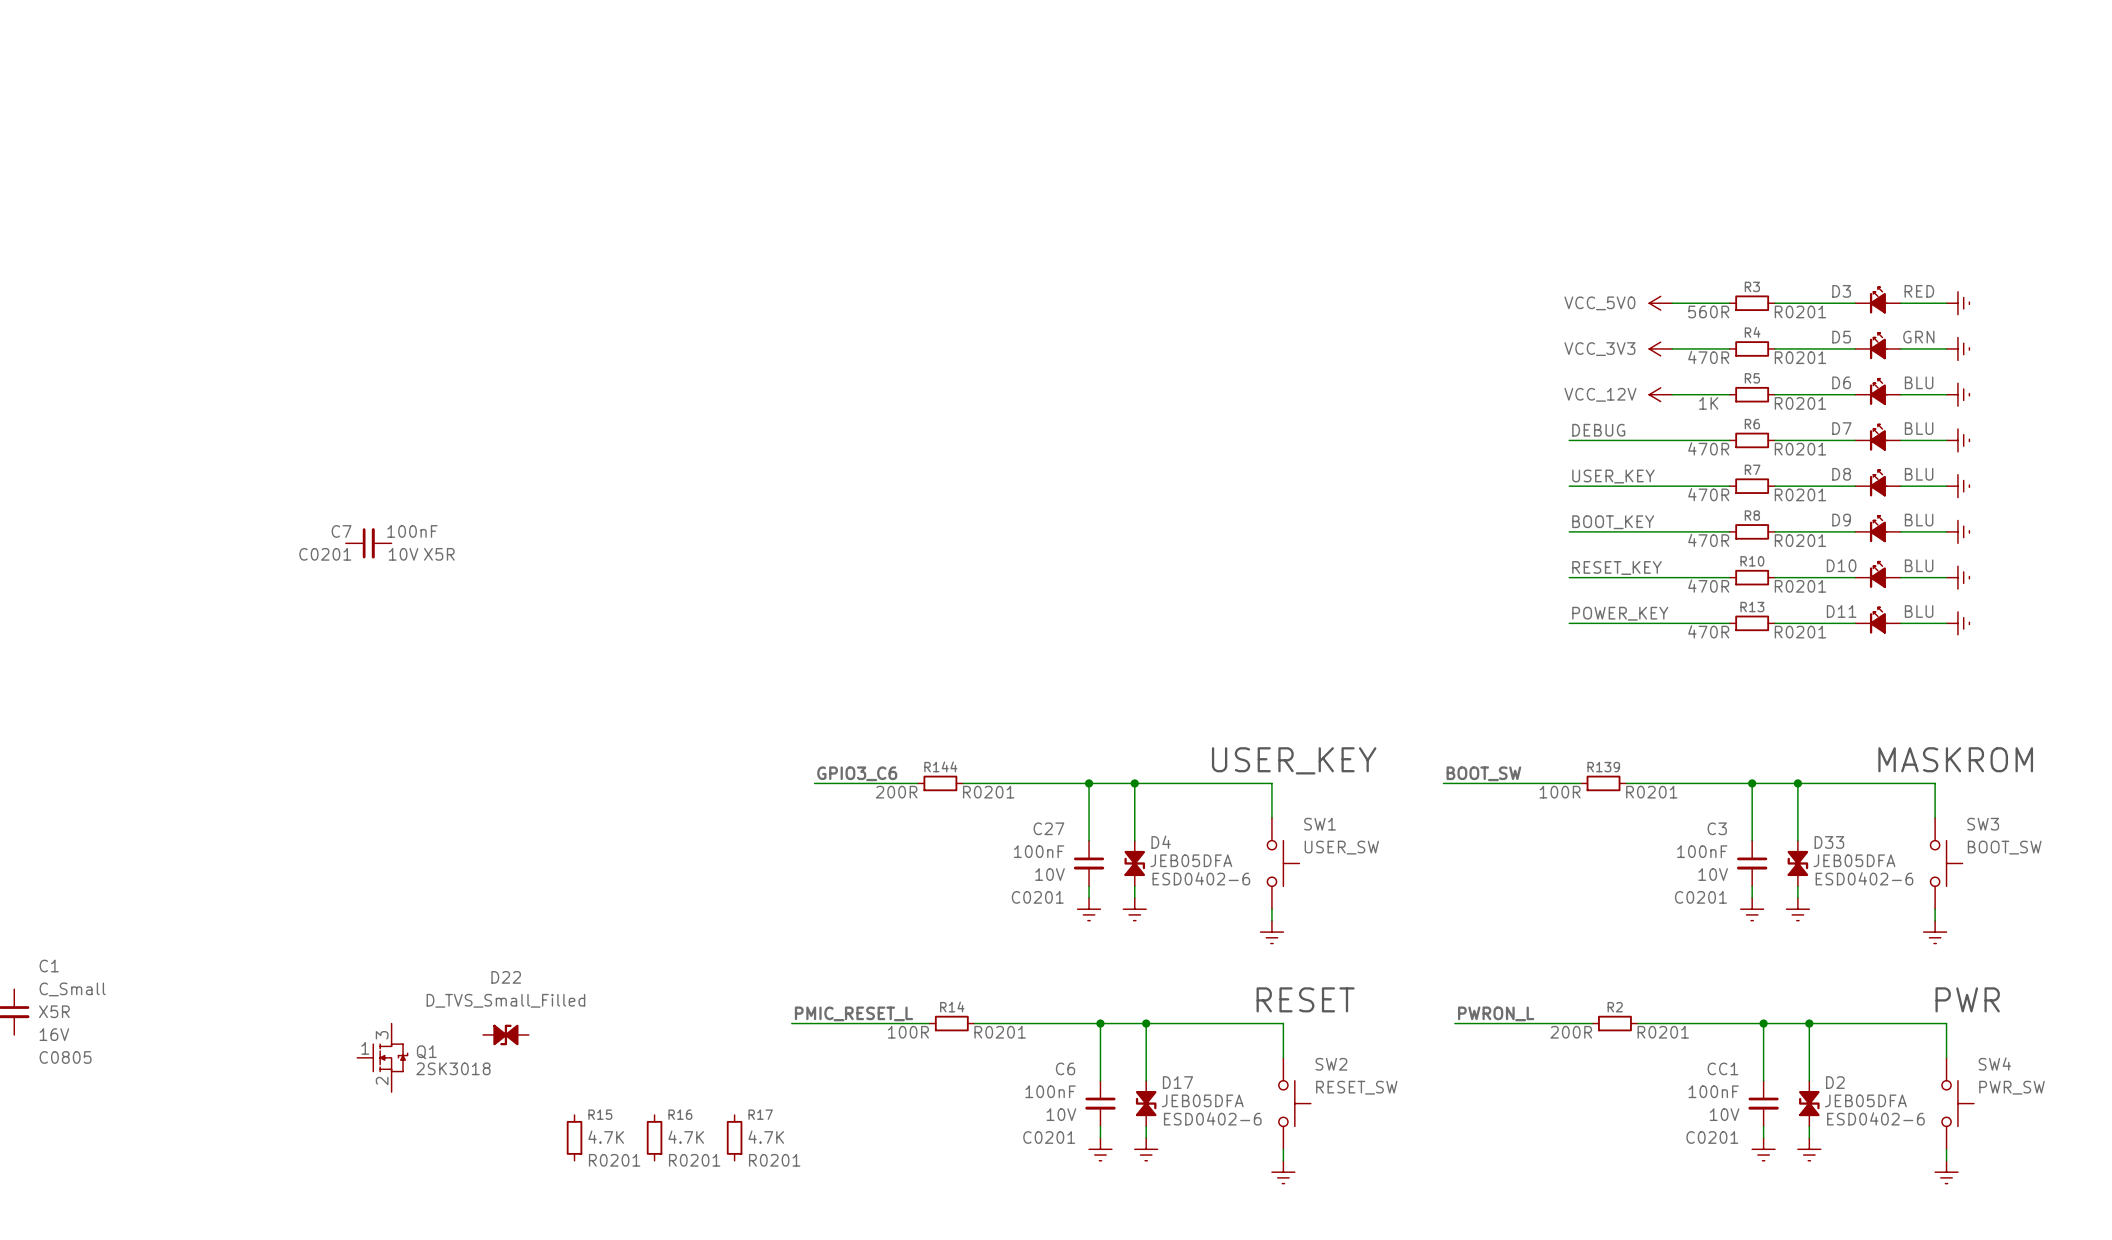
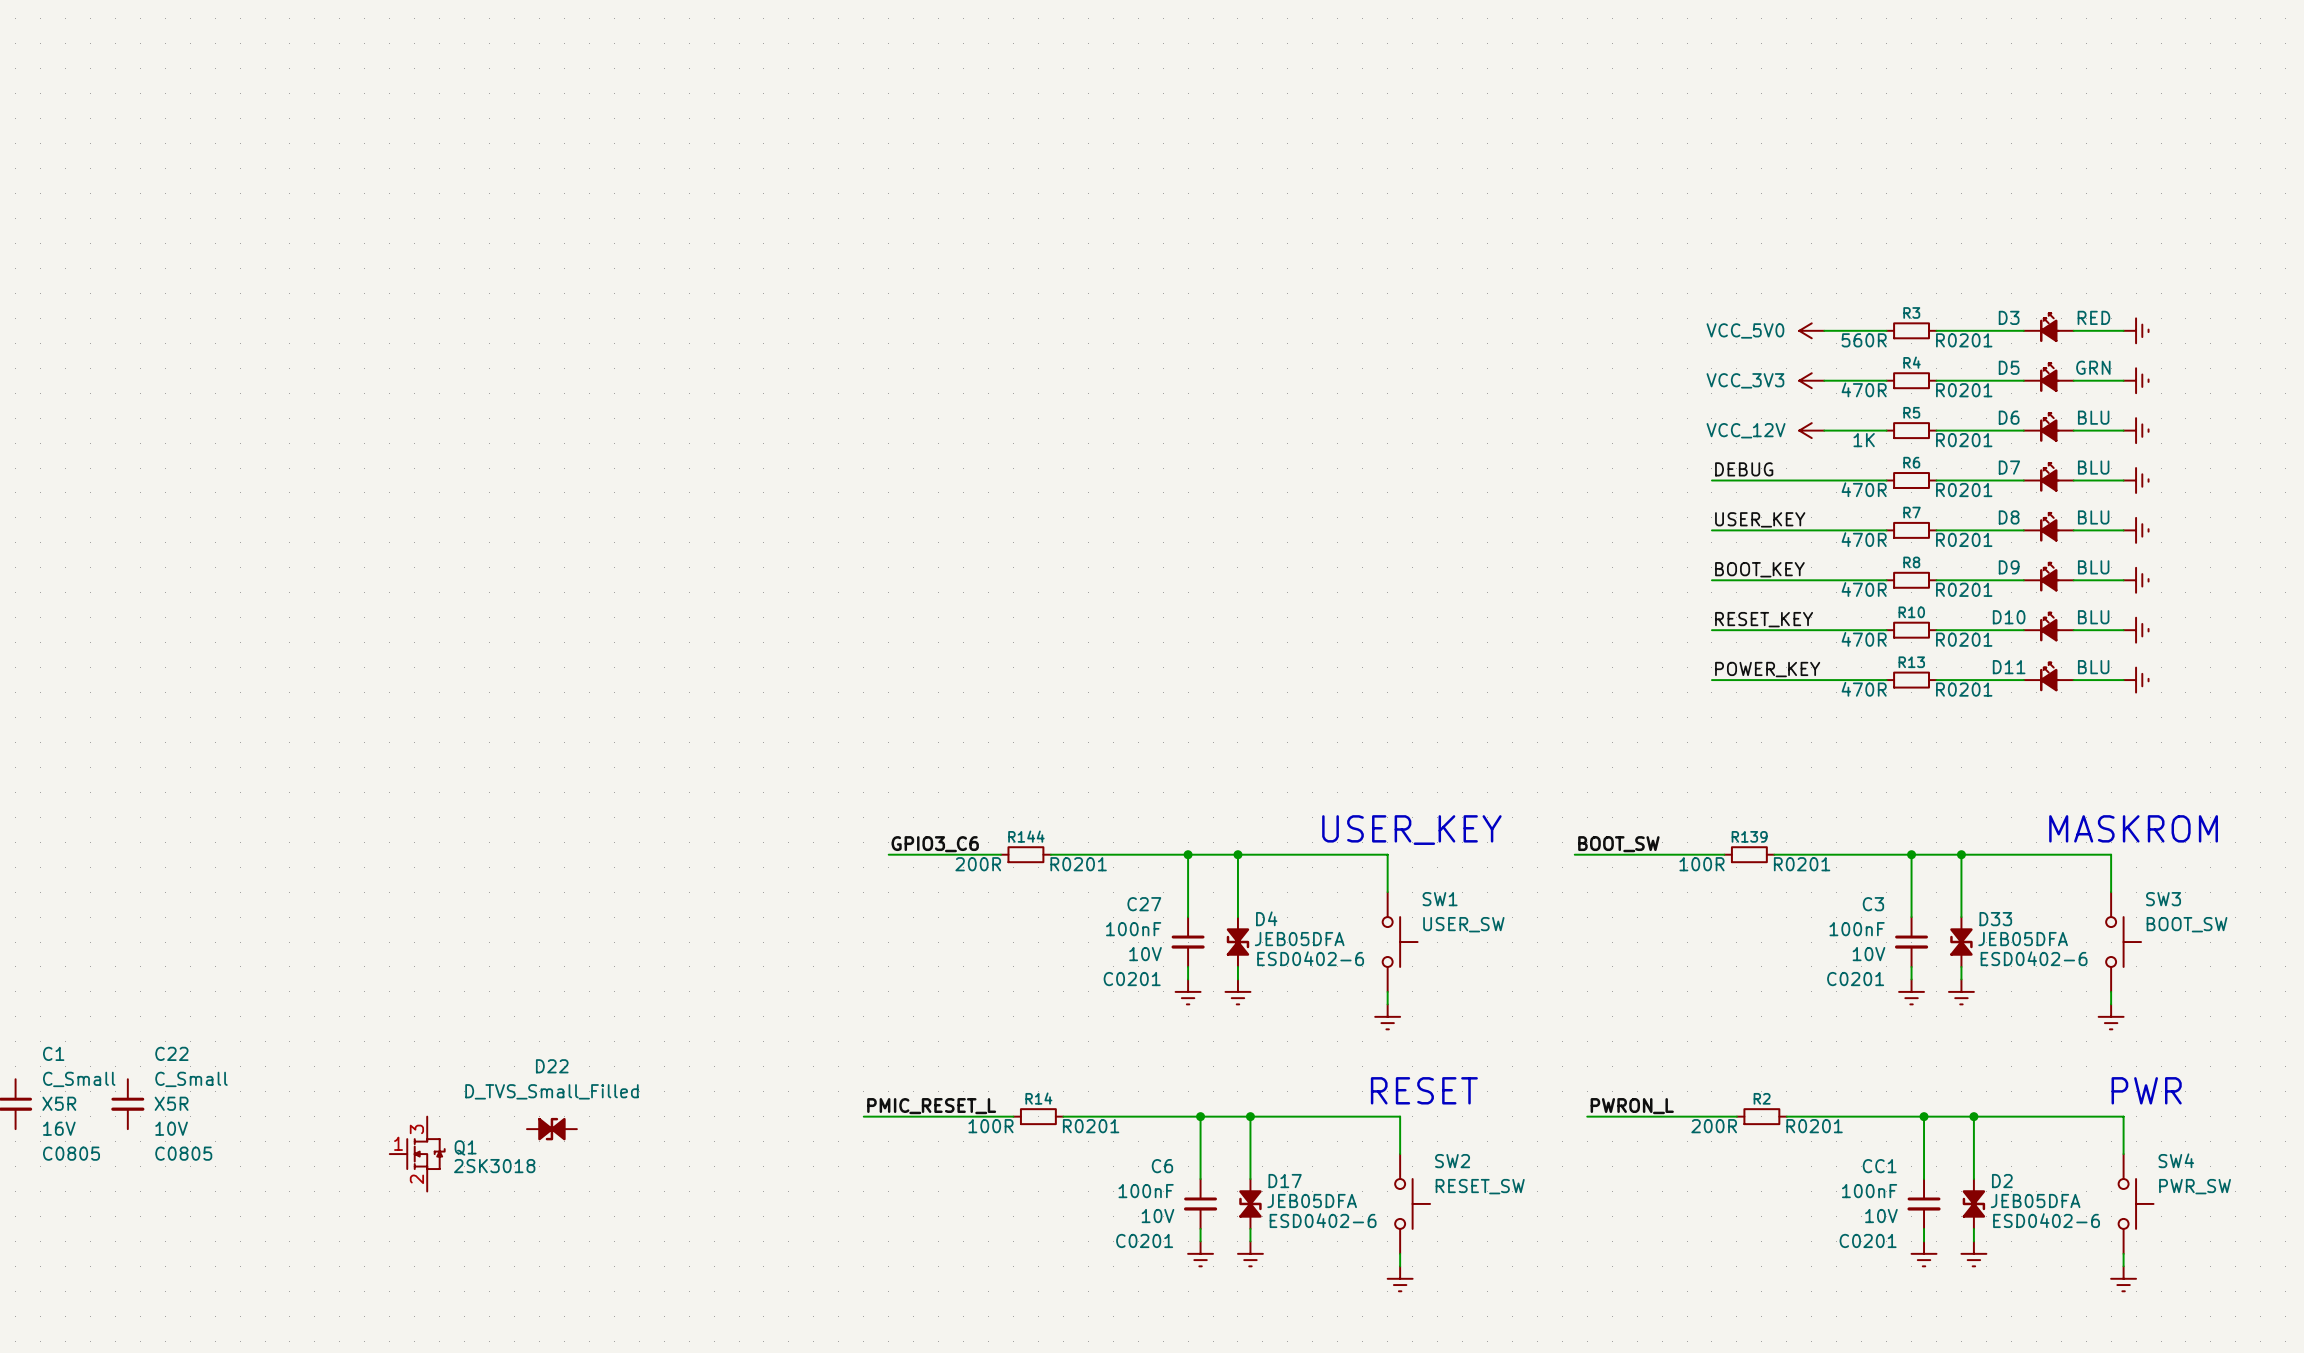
C7: 100nF (368, 543) -> none
C22: none -> C_Small (127, 1104)
R15: 4.7K (574, 1137) -> none
R16: 4.7K (654, 1137) -> none
R17: 4.7K (734, 1137) -> none

